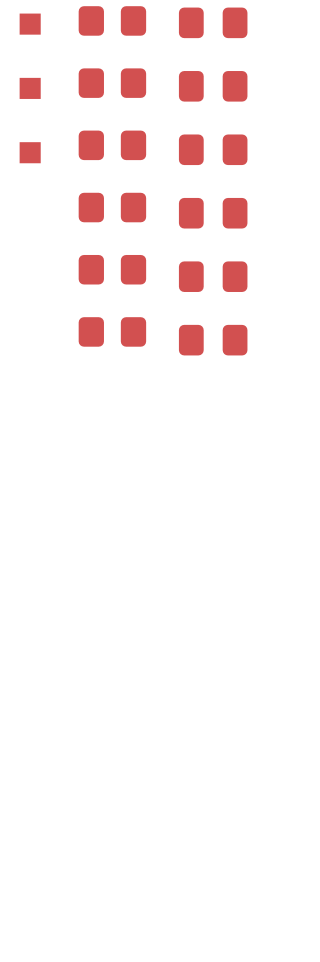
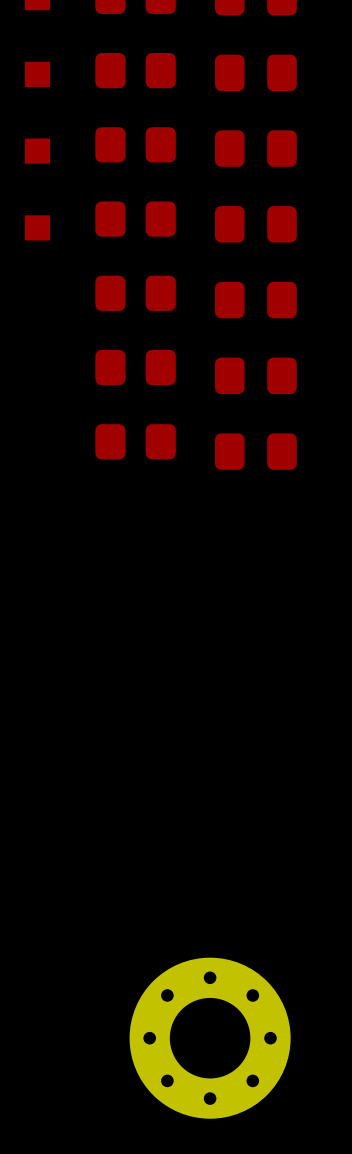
part: none -> (210, 1038)

